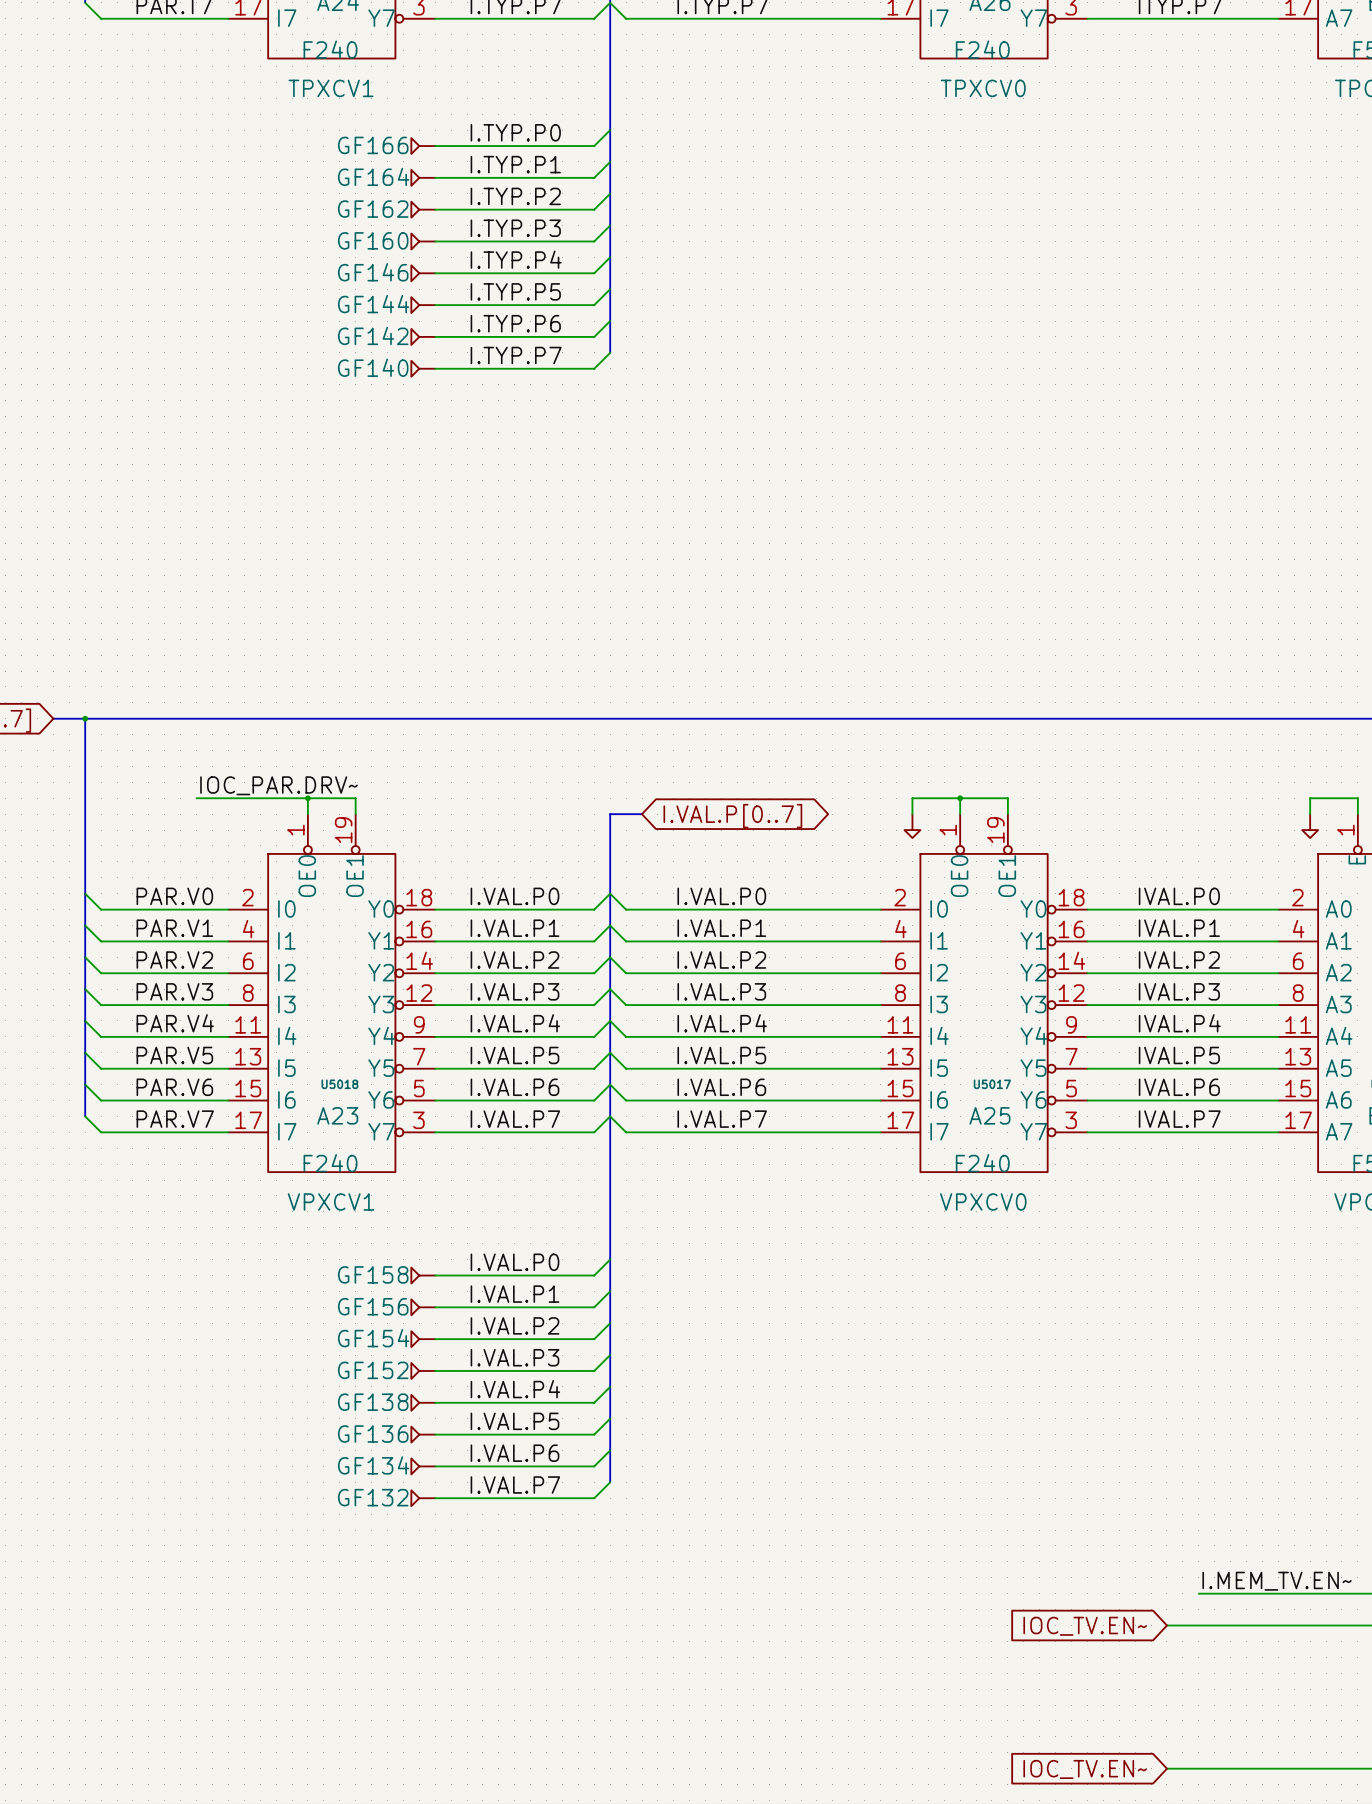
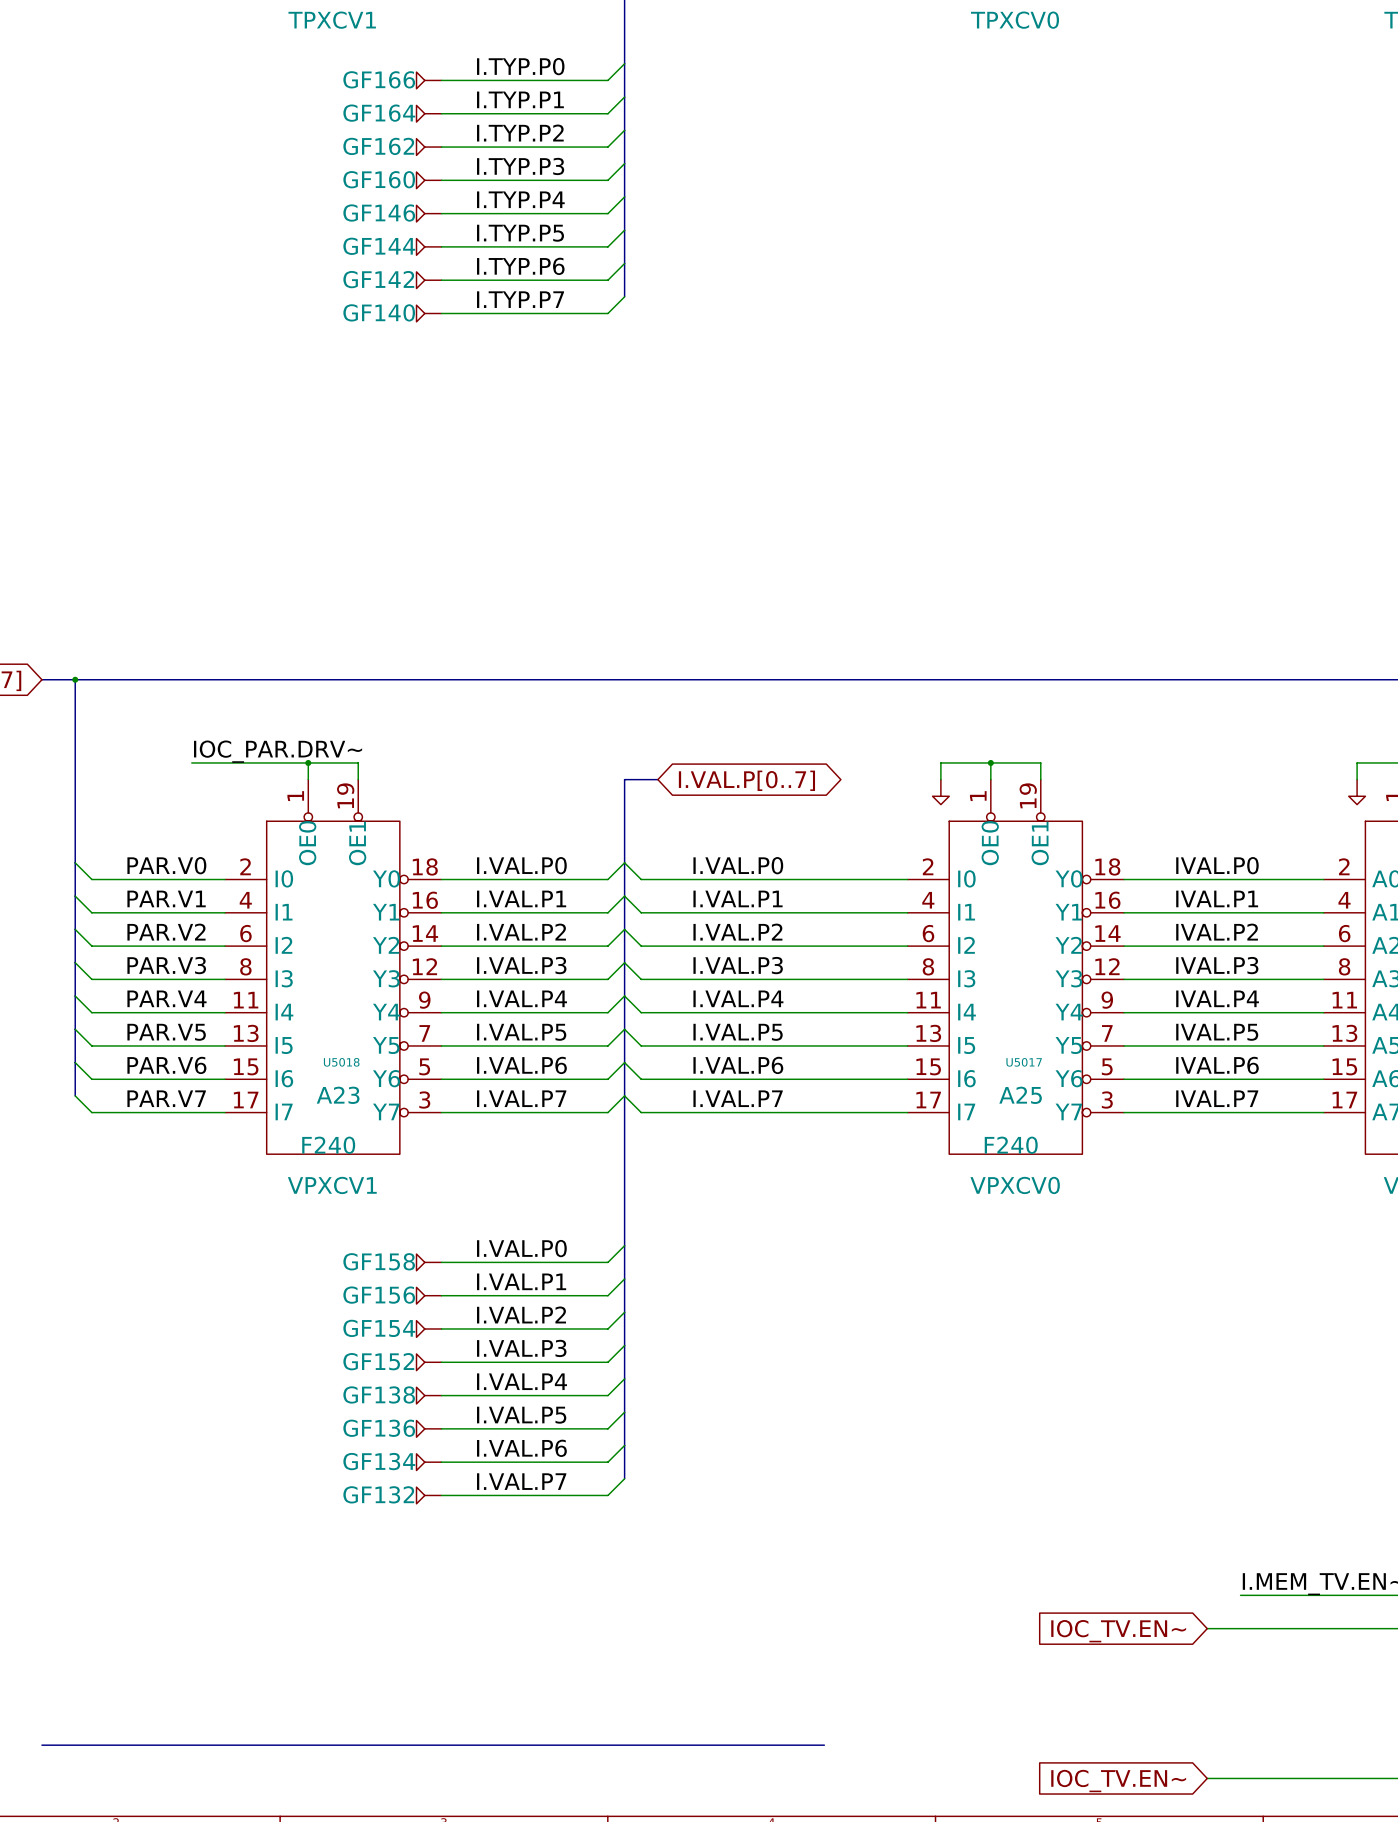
bus: none -> (41, 1745) (824, 1745)

